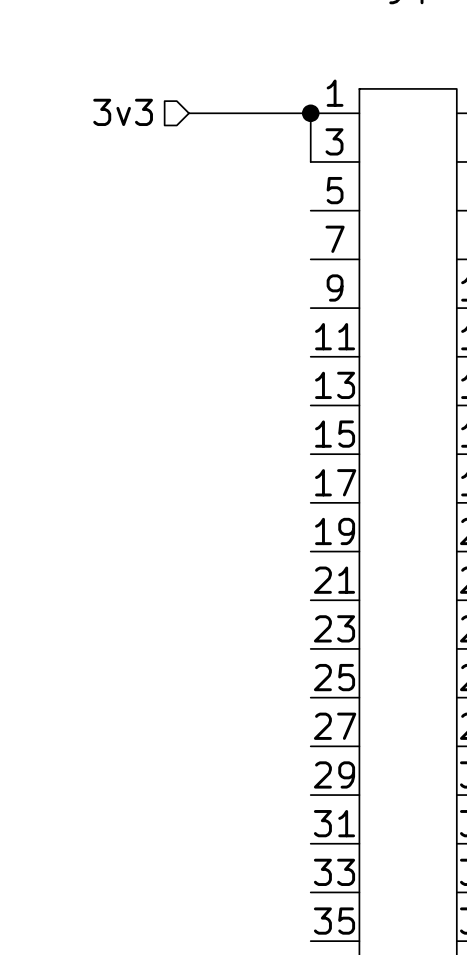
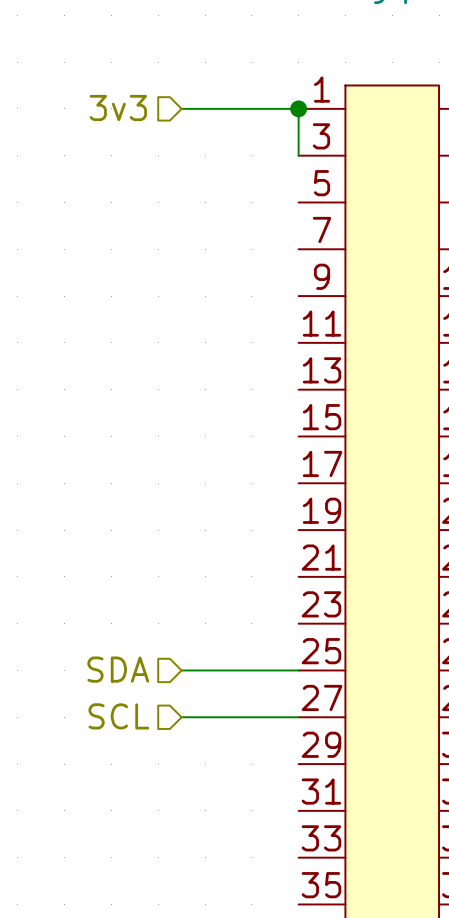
hierarchical label: none -> SDA (118, 669)
wire: none -> (181, 670) (298, 670)
hierarchical label: none -> SCL (118, 716)
wire: none -> (181, 717) (298, 717)

